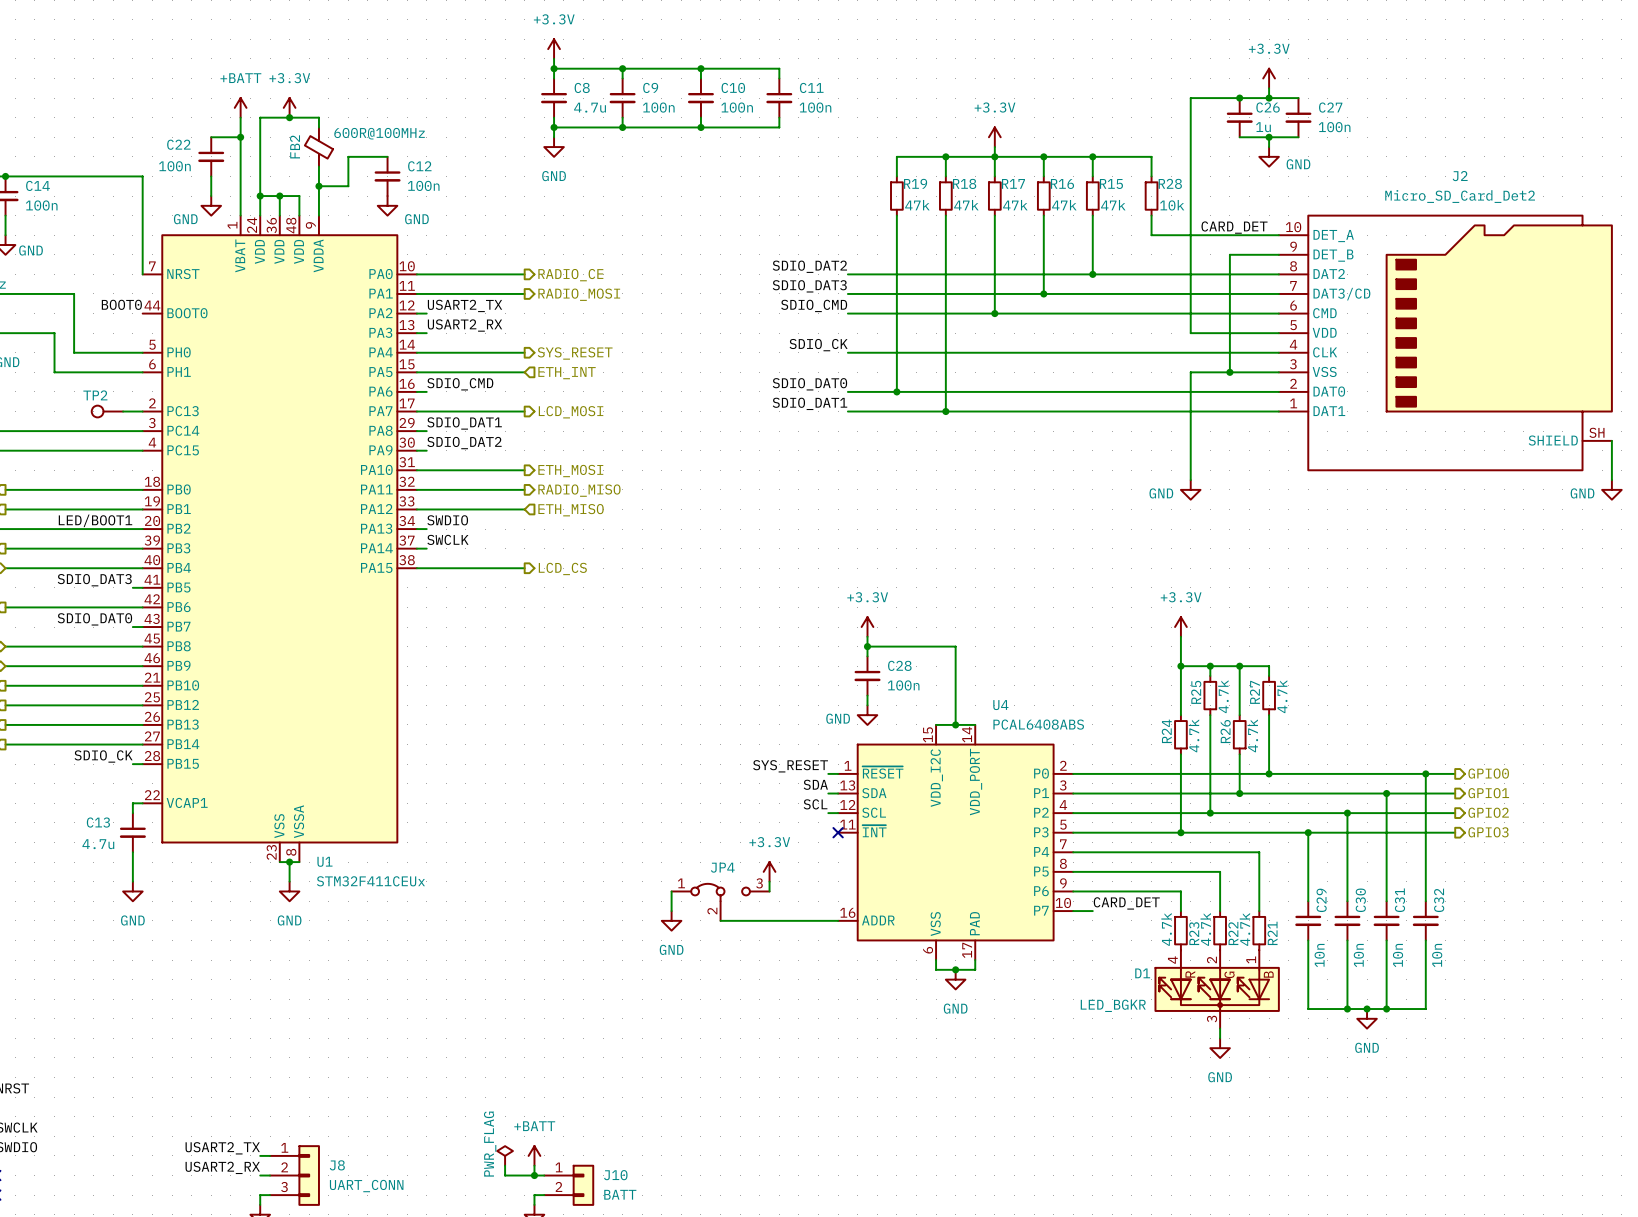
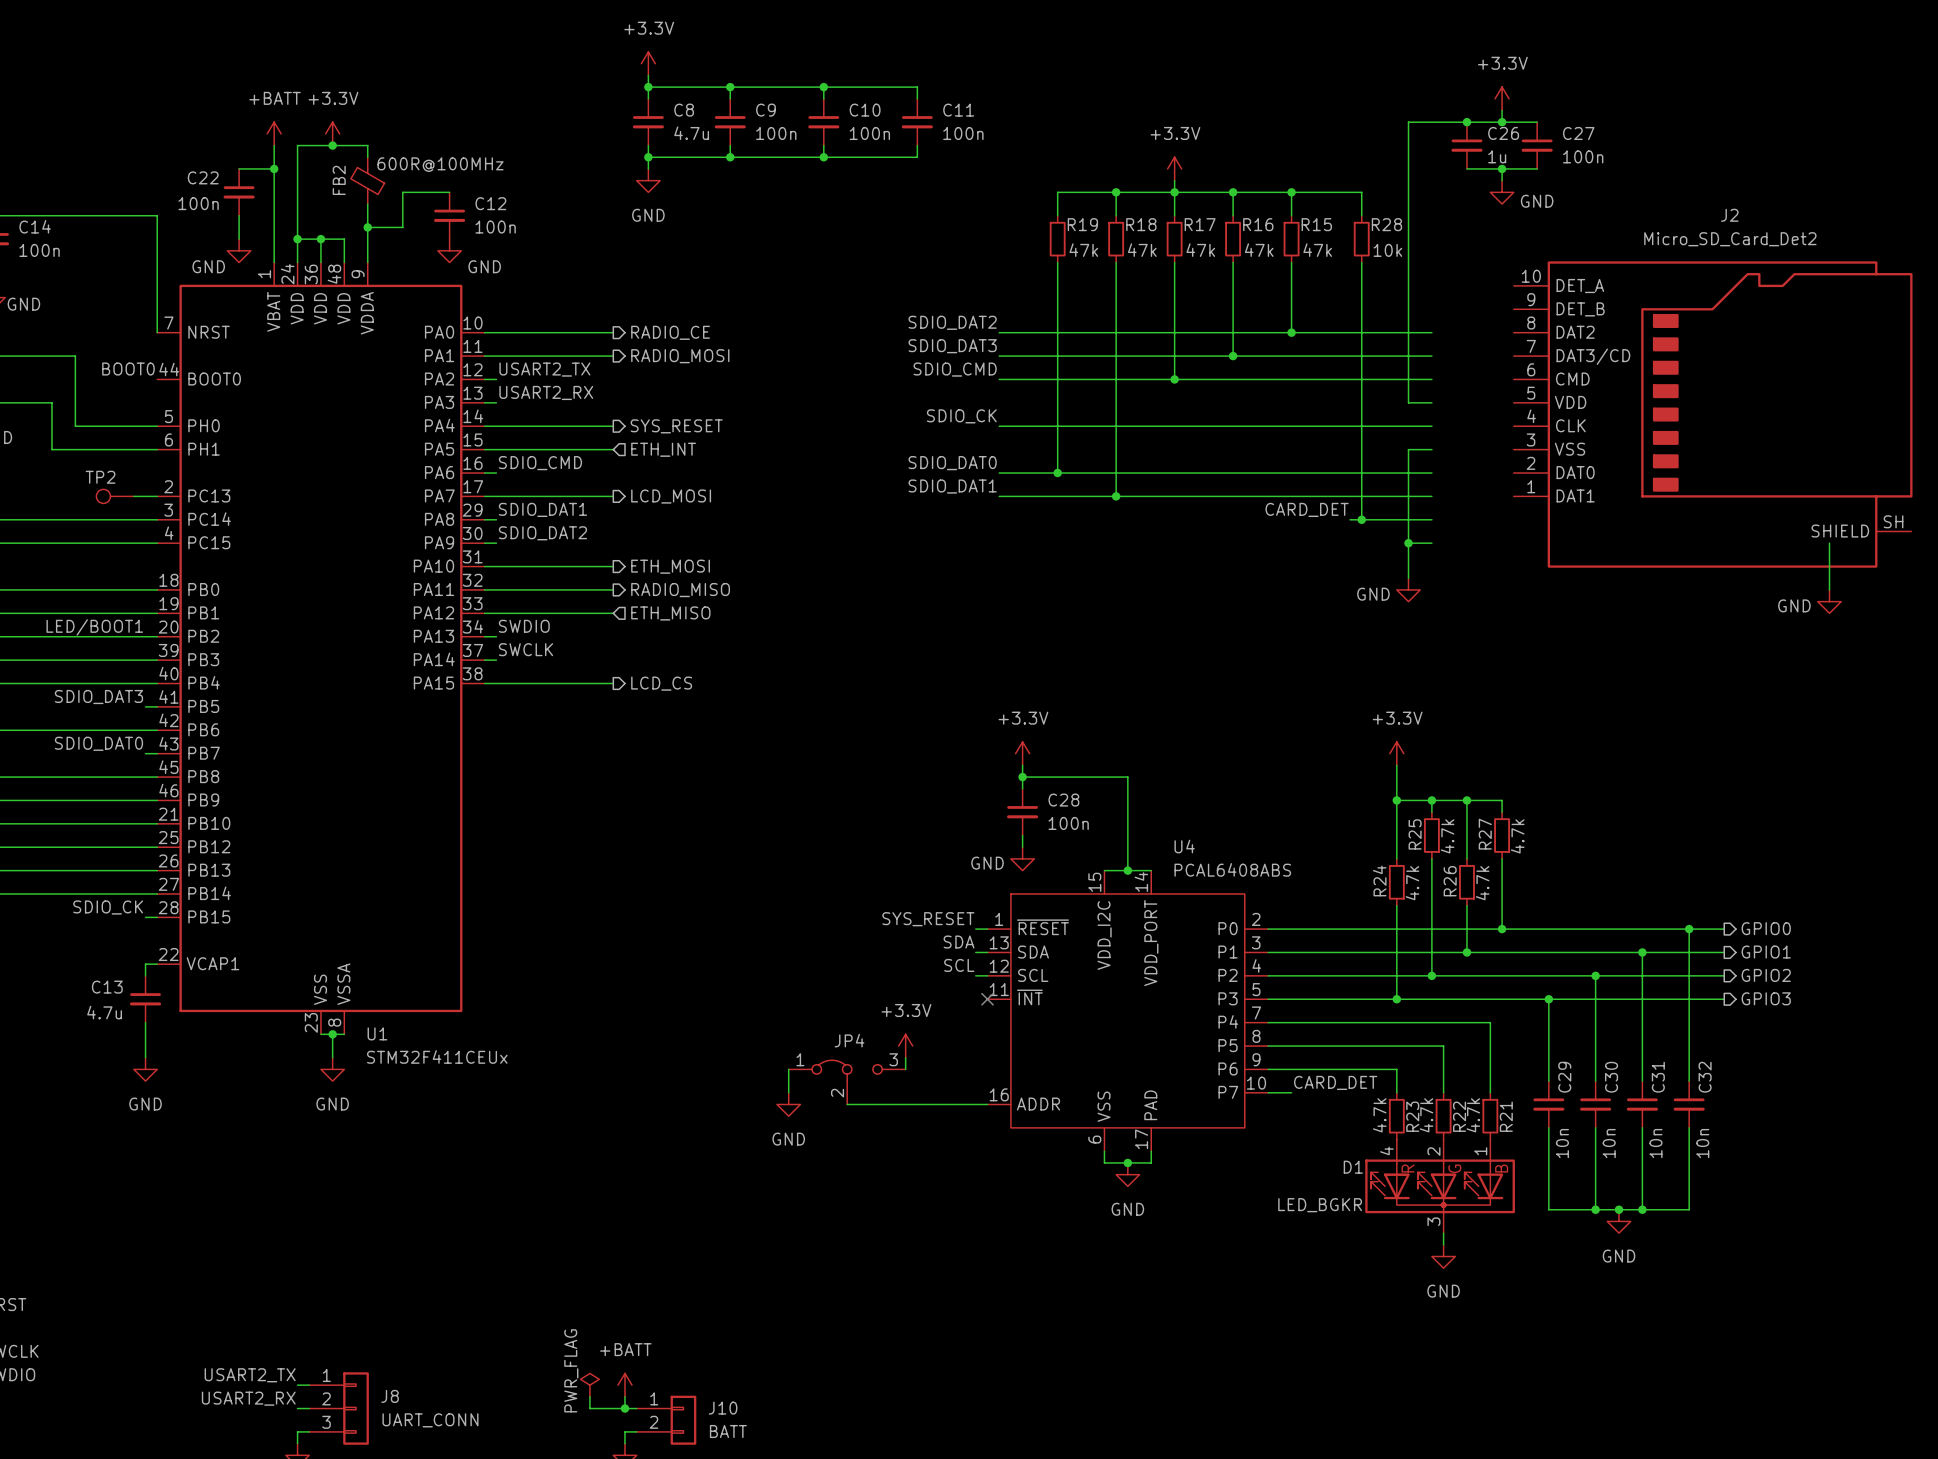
label: CARD_DET (1234, 227) -> none
wire: (1151, 235) (1278, 235) -> (1361, 285) (1361, 519)
wire: (1278, 254) (1229, 254) (1229, 372) -> none
wire: (1210, 274) (1278, 274) -> none
wire: (1210, 293) (1278, 293) -> none
wire: (1210, 313) (1278, 313) -> none
wire: (1210, 333) (1278, 333) -> none
wire: (1210, 352) (1278, 352) -> none
wire: (1210, 372) (1278, 372) -> none
junction: (1229, 372) -> none
wire: (1210, 391) (1278, 391) -> none
wire: (1210, 411) (1278, 411) -> (1350, 519) (1431, 519)
label: none -> CARD_DET (1307, 509)
junction: none -> (1361, 519)
wire: (1611, 440) (1611, 480) -> (1829, 543) (1829, 589)
wire: none -> (1408, 543) (1431, 543)
junction: none -> (1408, 543)
power symbol position: GND (1611, 489) -> GND (1829, 601)

